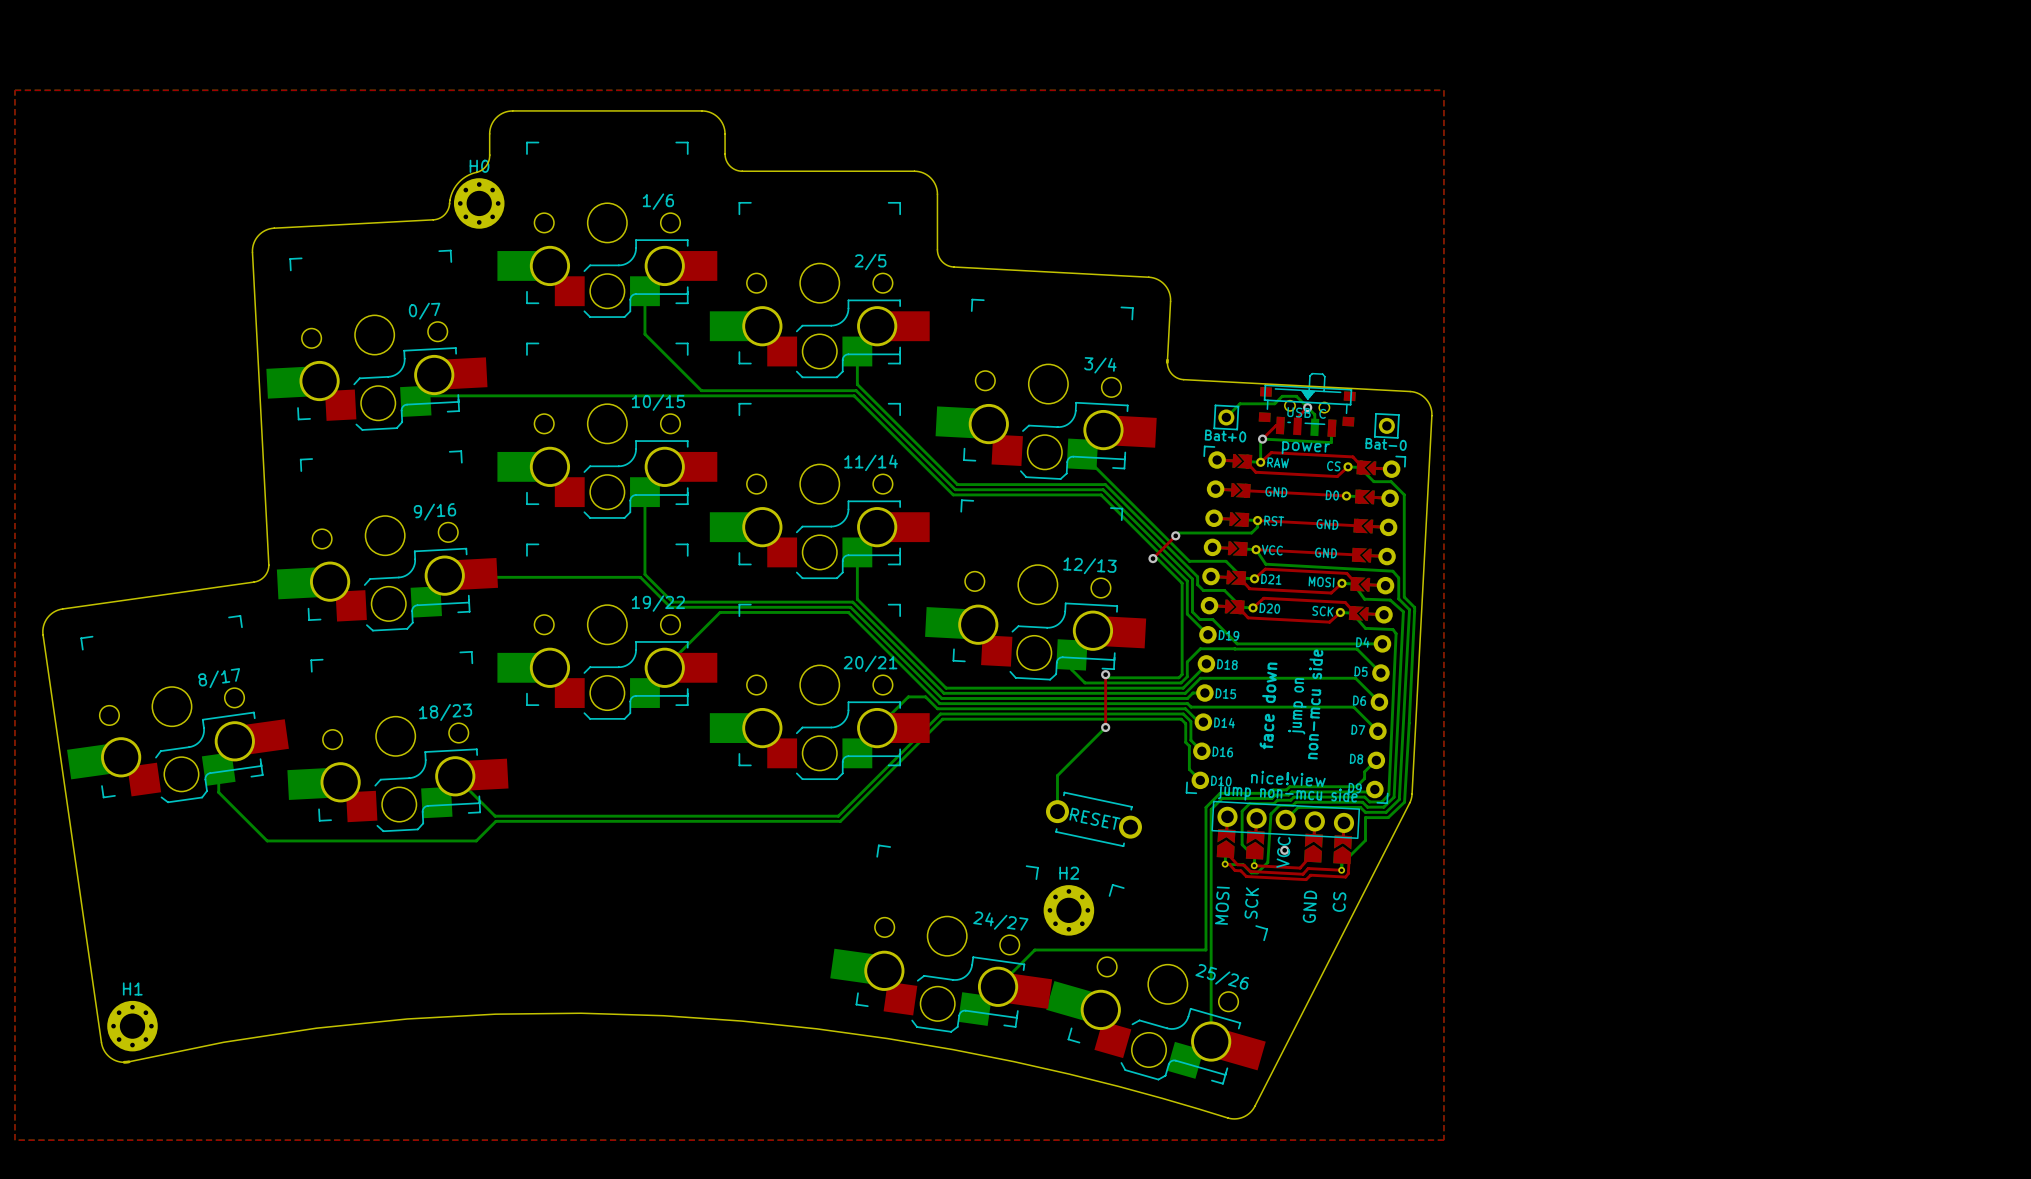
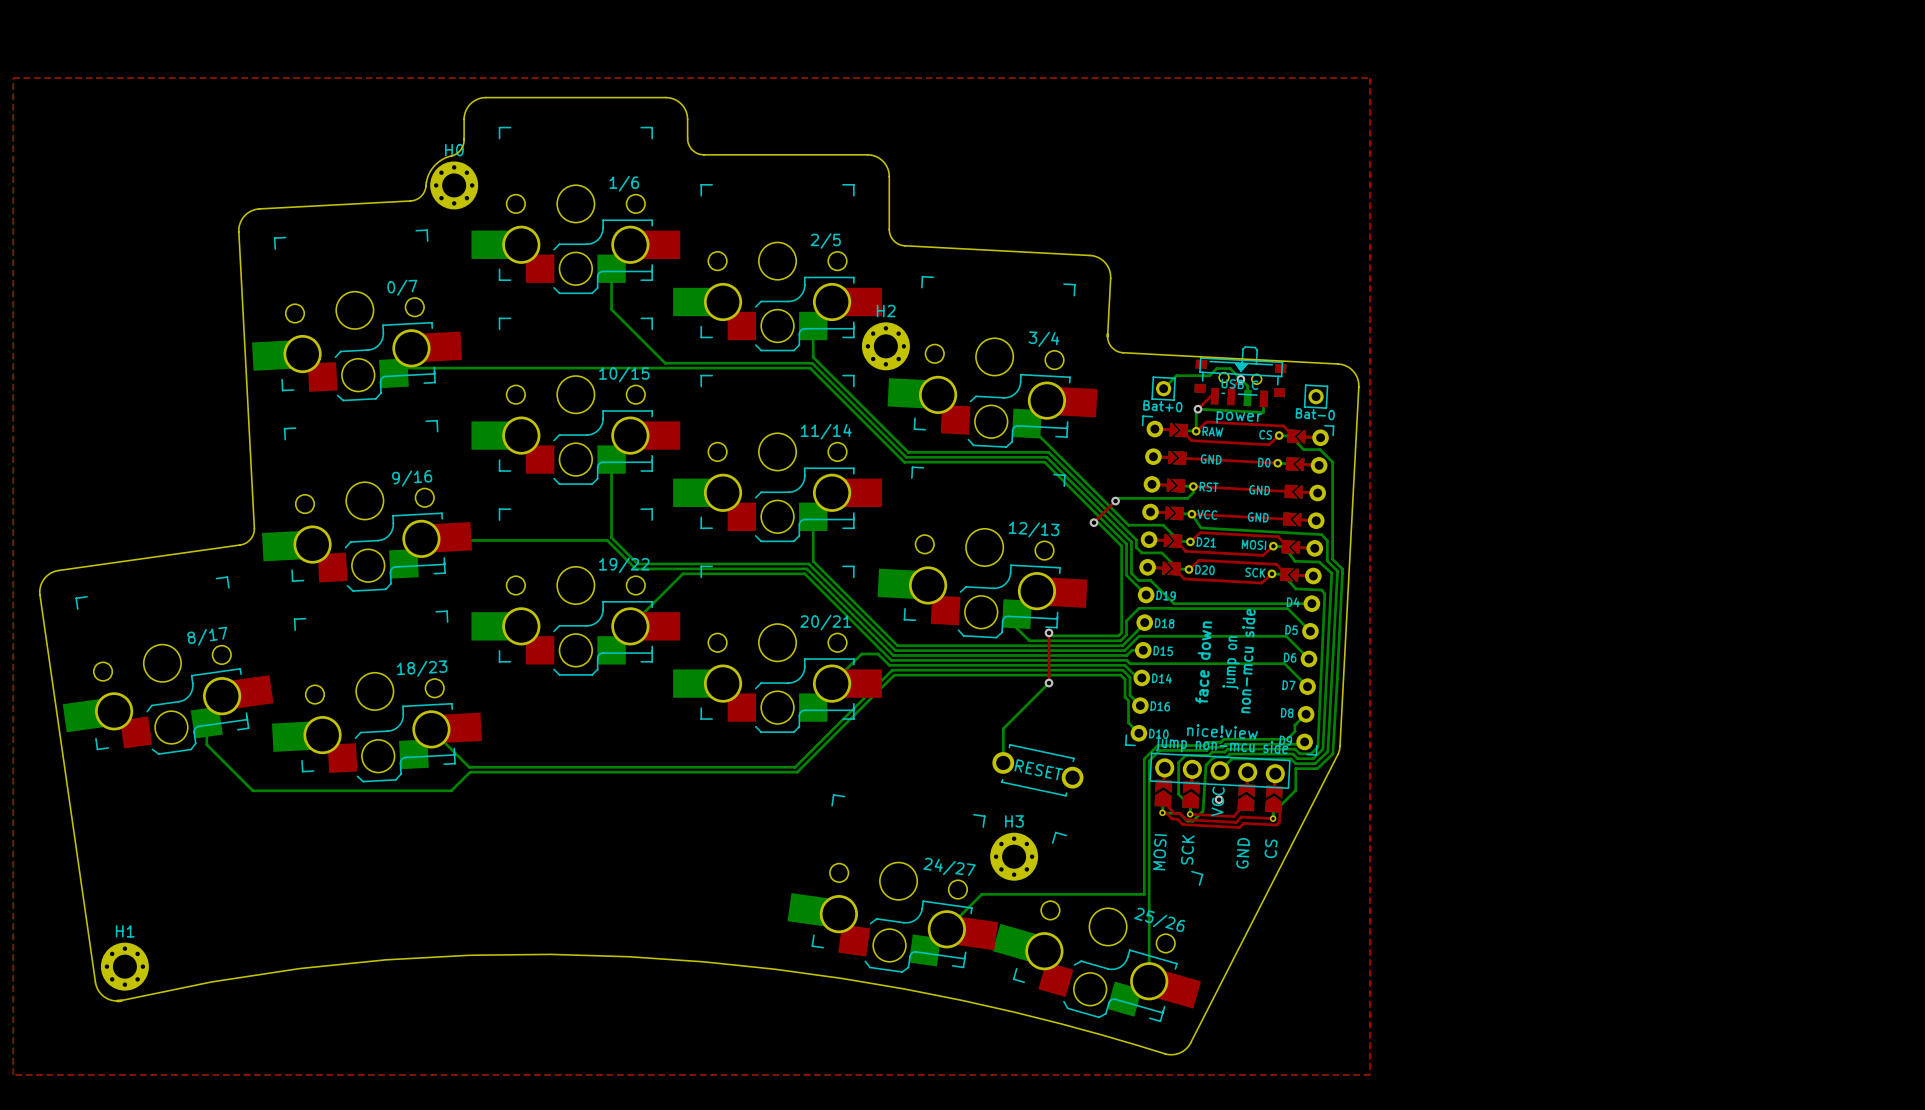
H2: none -> (885, 346)
H2 name: H2 (1069, 873) -> H3 (1014, 821)

